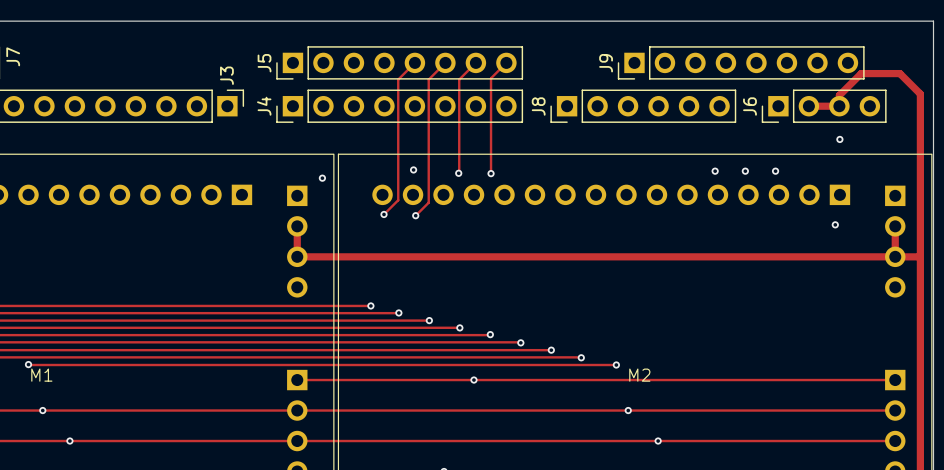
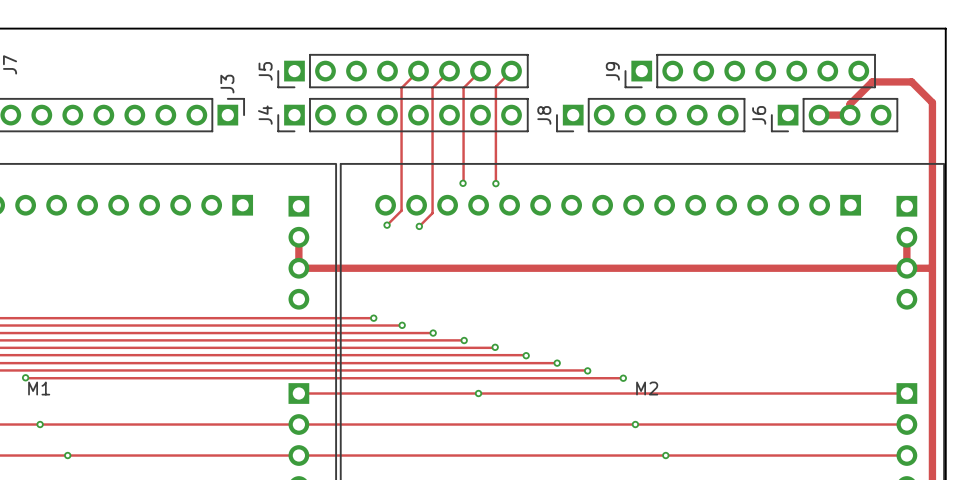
via: (839, 139) -> none
via: (413, 169) -> none
via: (715, 171) -> none
via: (745, 171) -> none
via: (775, 171) -> none
via: (322, 178) -> none
via: (835, 224) -> none

